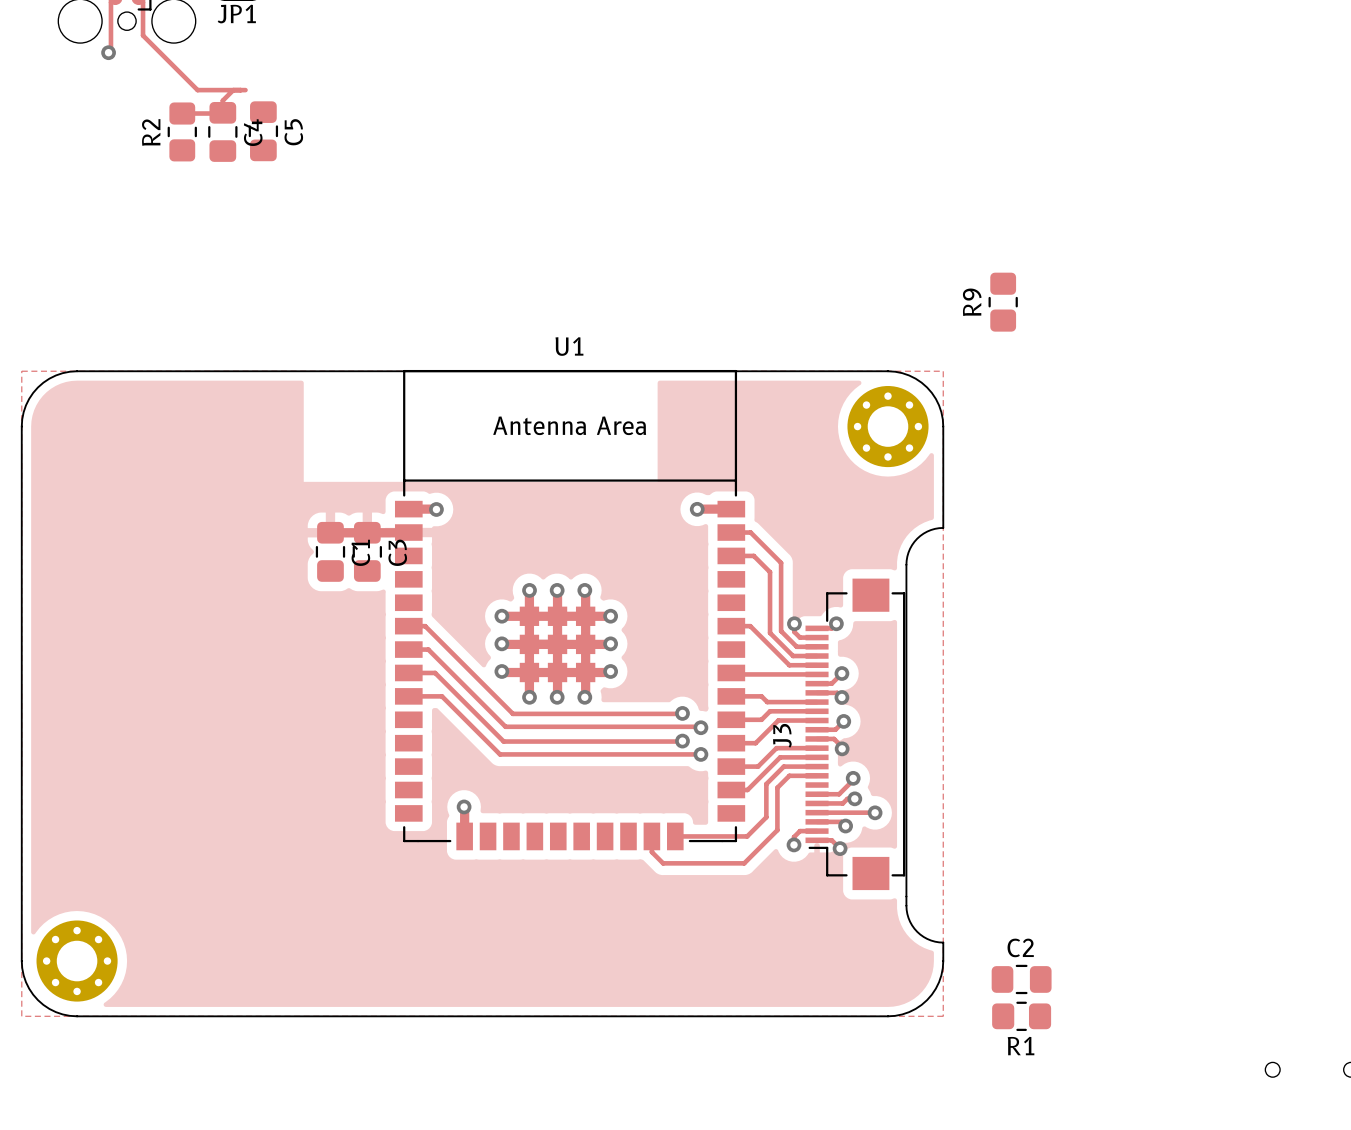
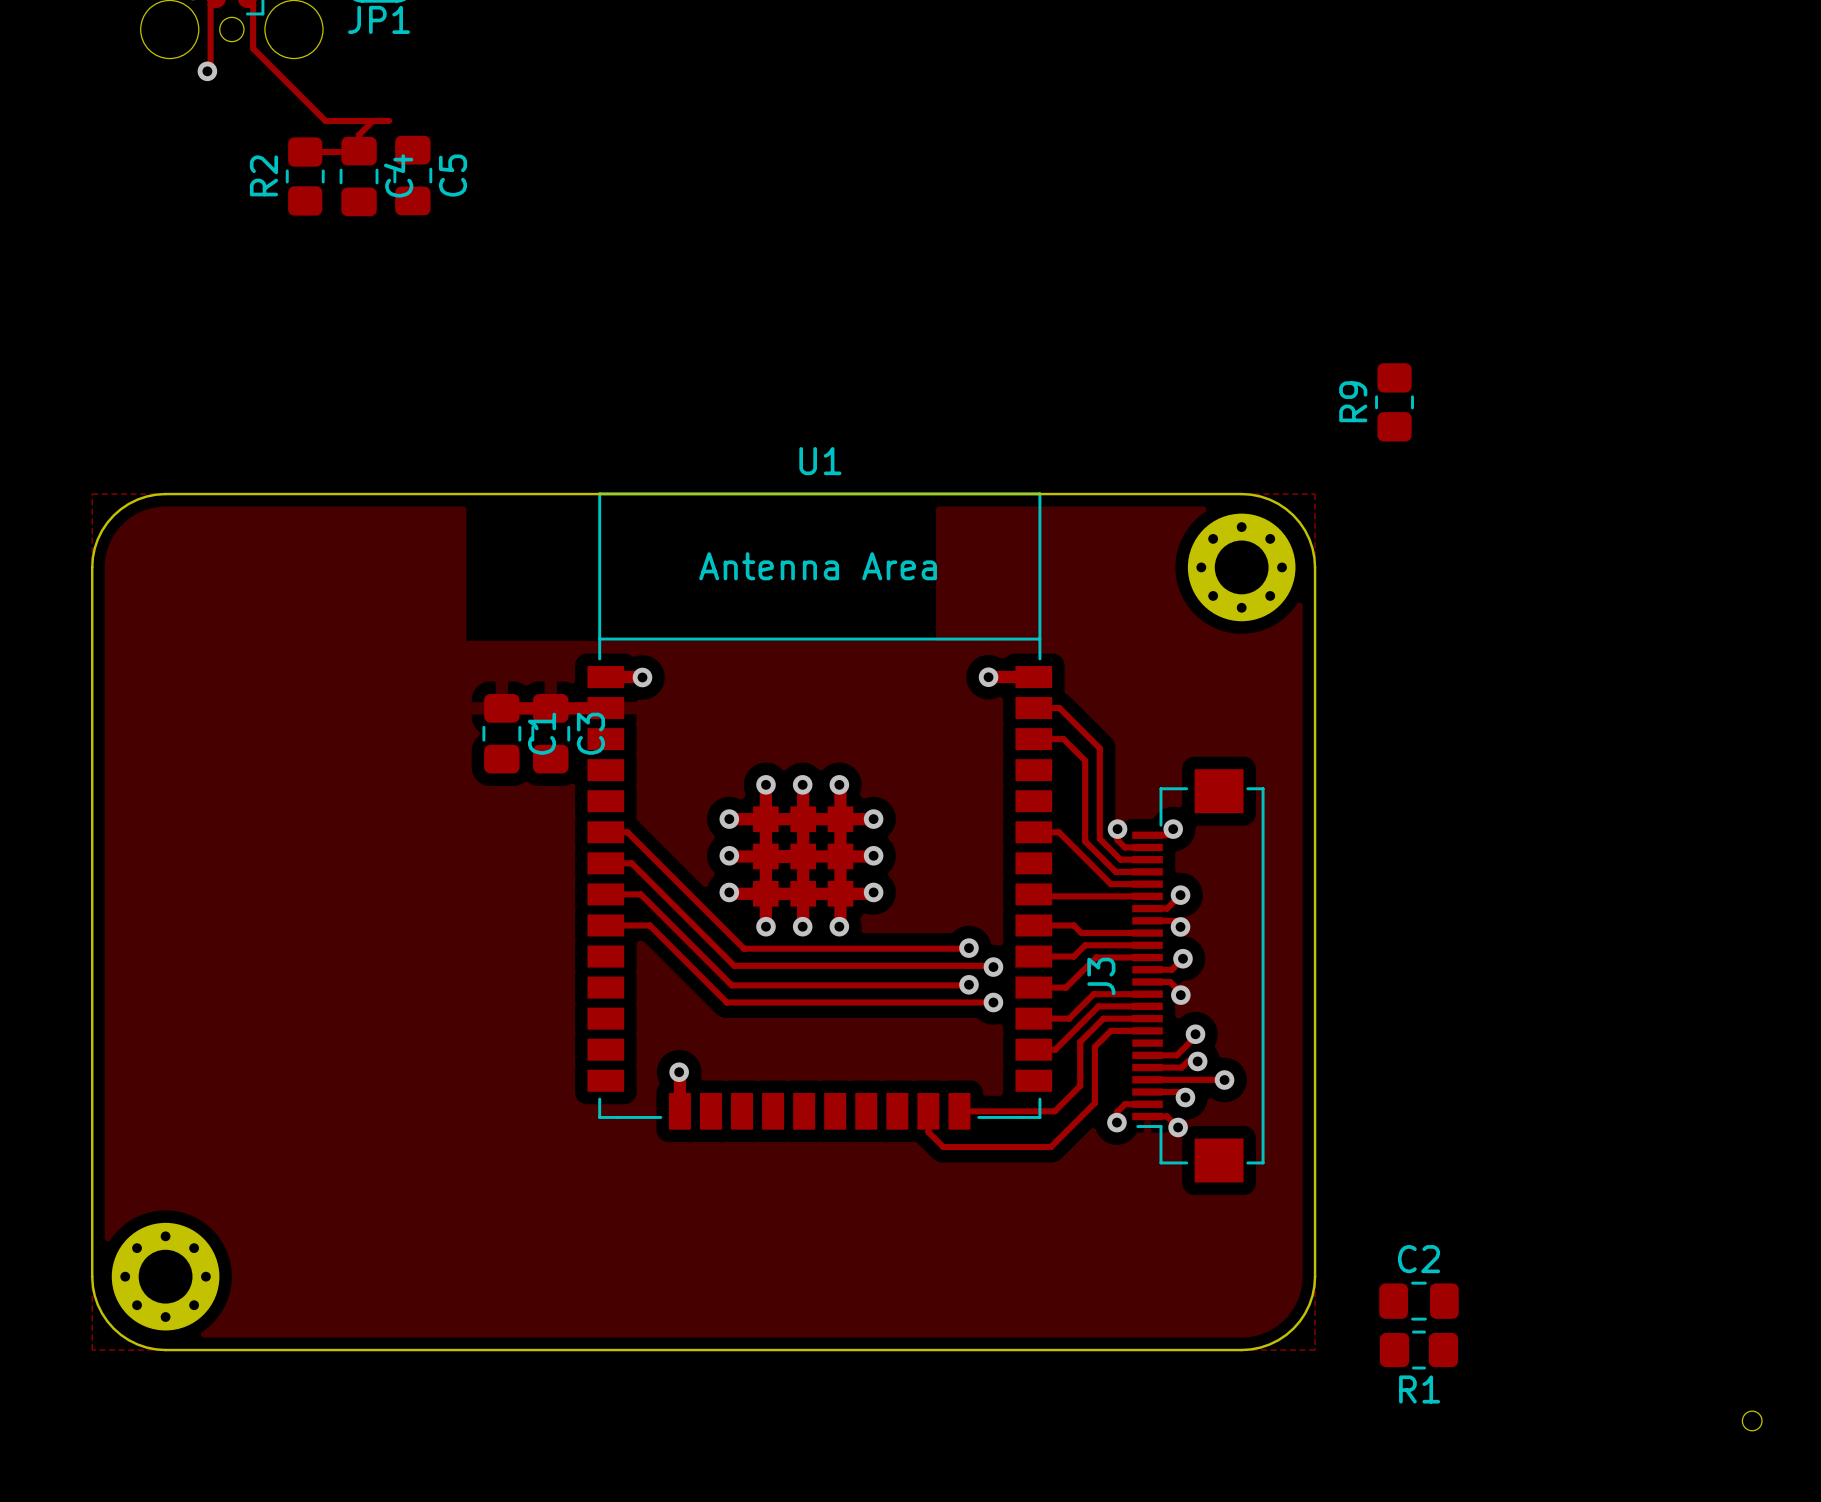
board edge: (943, 527) (927, 531) (917, 538) (908, 552) (906, 564) (906, 909) (912, 925) (920, 934) (931, 940) (943, 942) -> (1315, 701) (1315, 1252)

